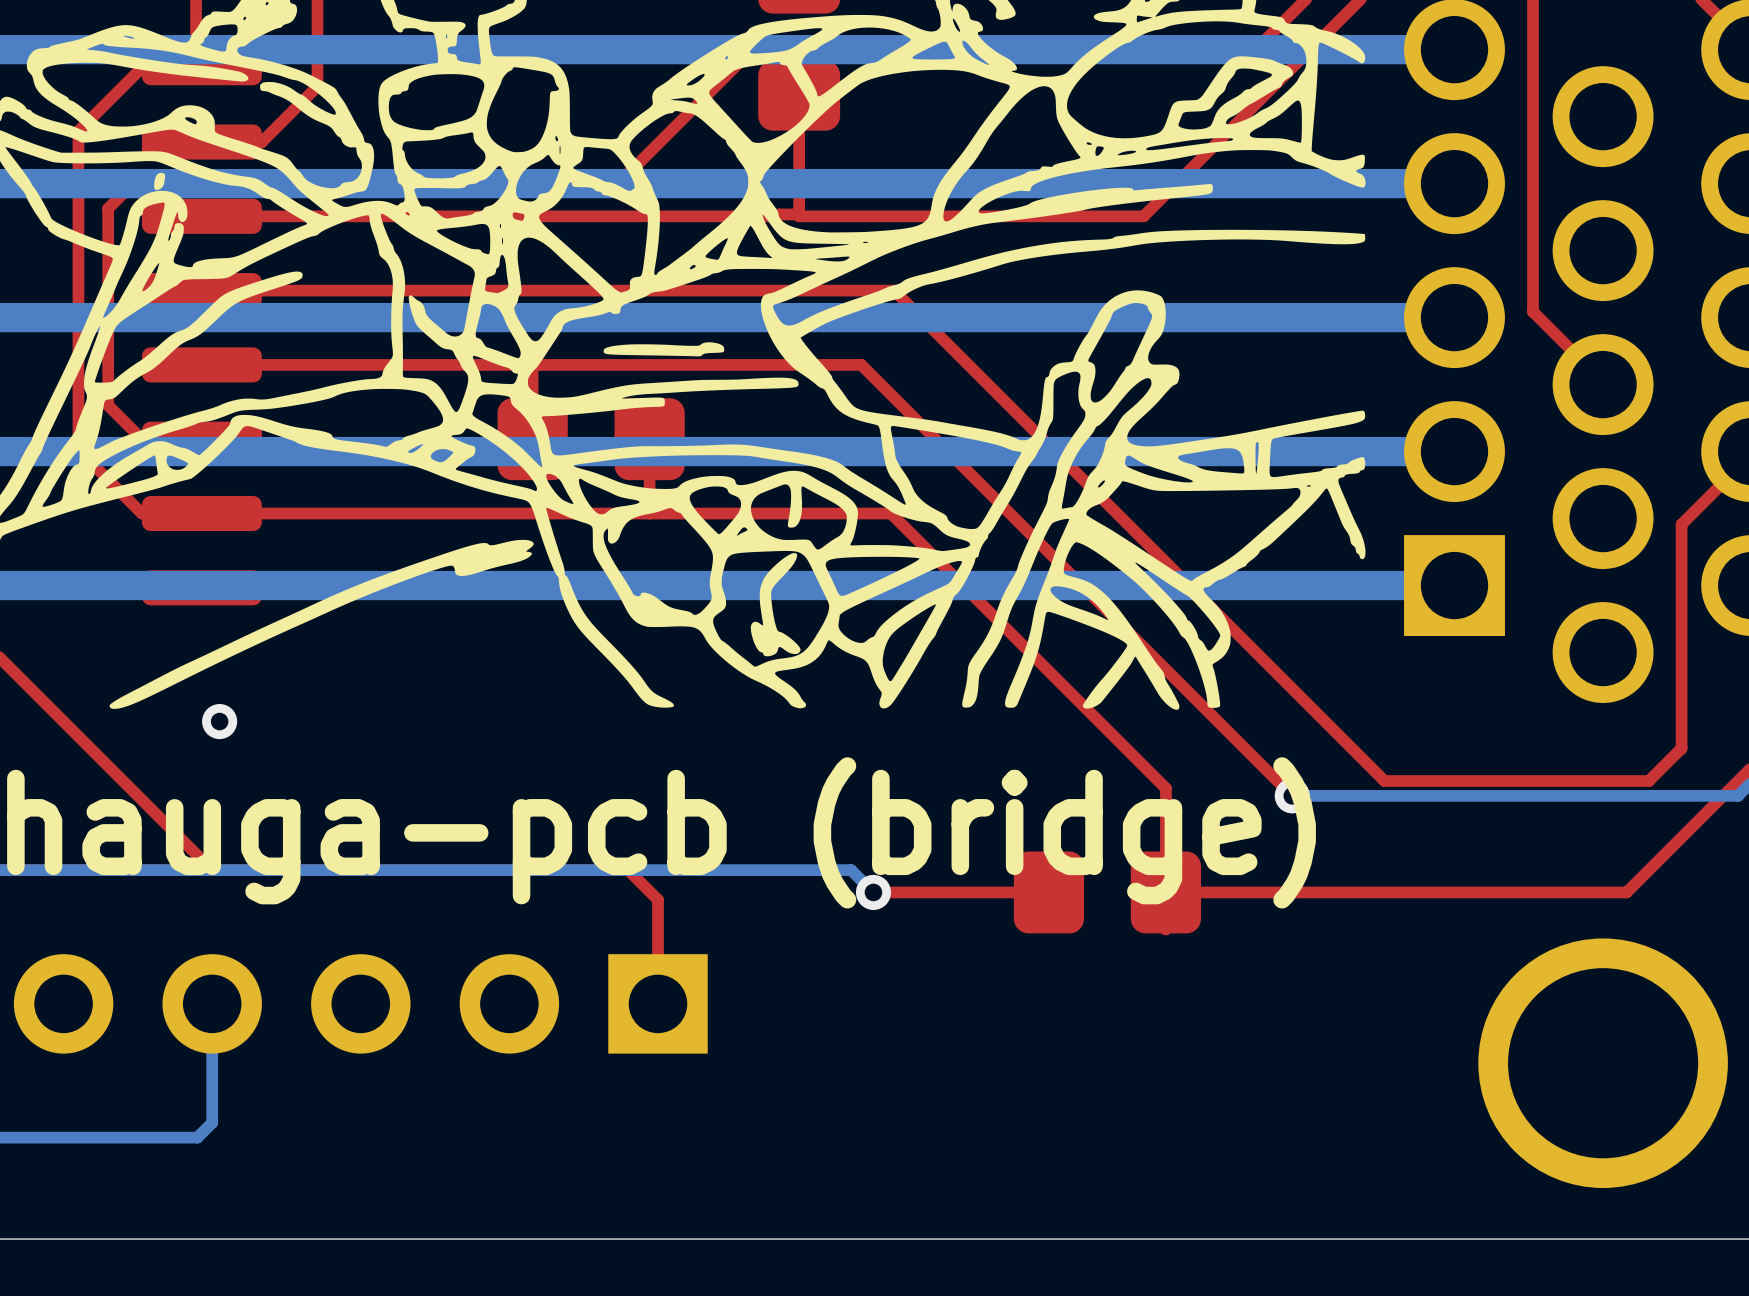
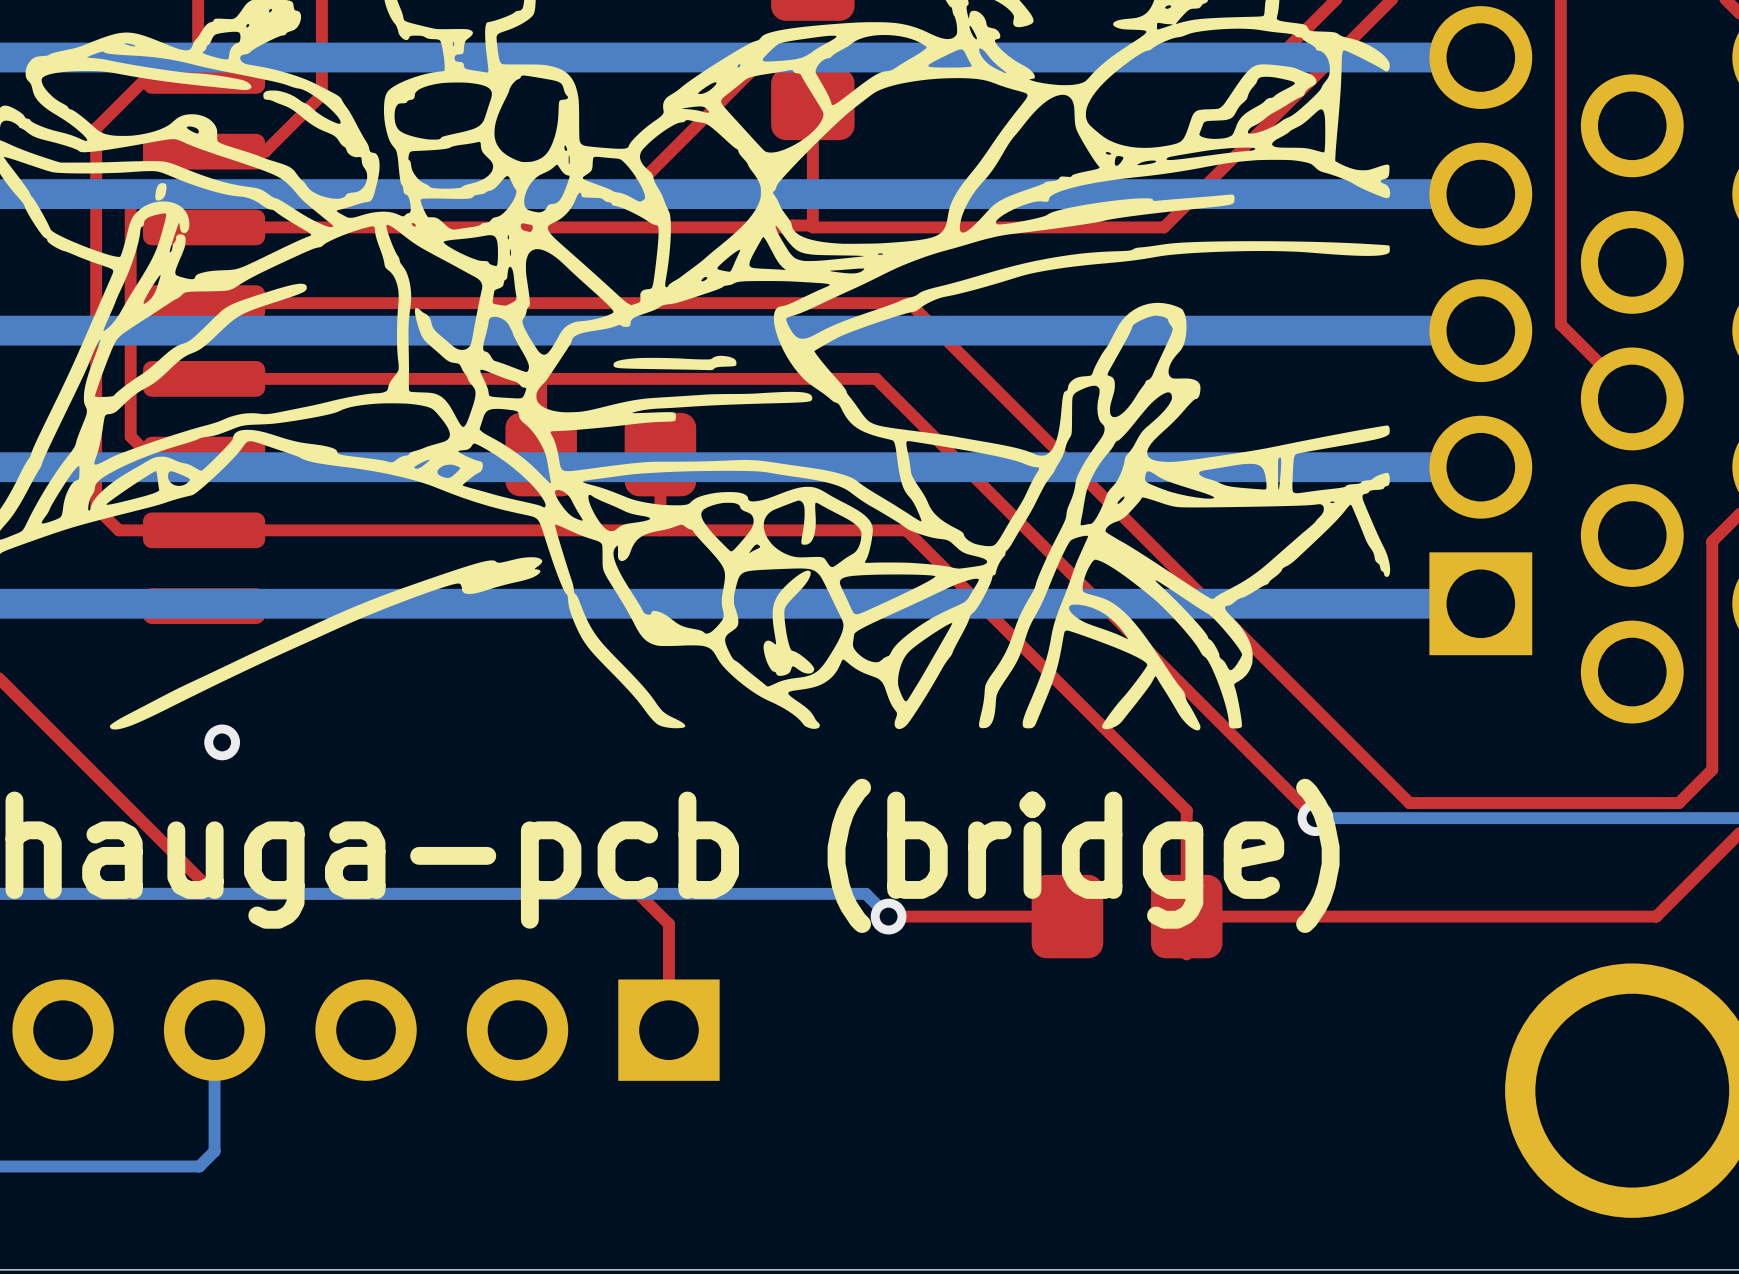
top track: (147, 67) (141, 67) (78, 131) (78, 450) (141, 513) -> (148, 75) (96, 128) (96, 507) (118, 530) (142, 530)
top track: (145, 181) (135, 181) (108, 208) (108, 405) (141, 439) (147, 439) -> (146, 191) (130, 207) (130, 436) (148, 454)

